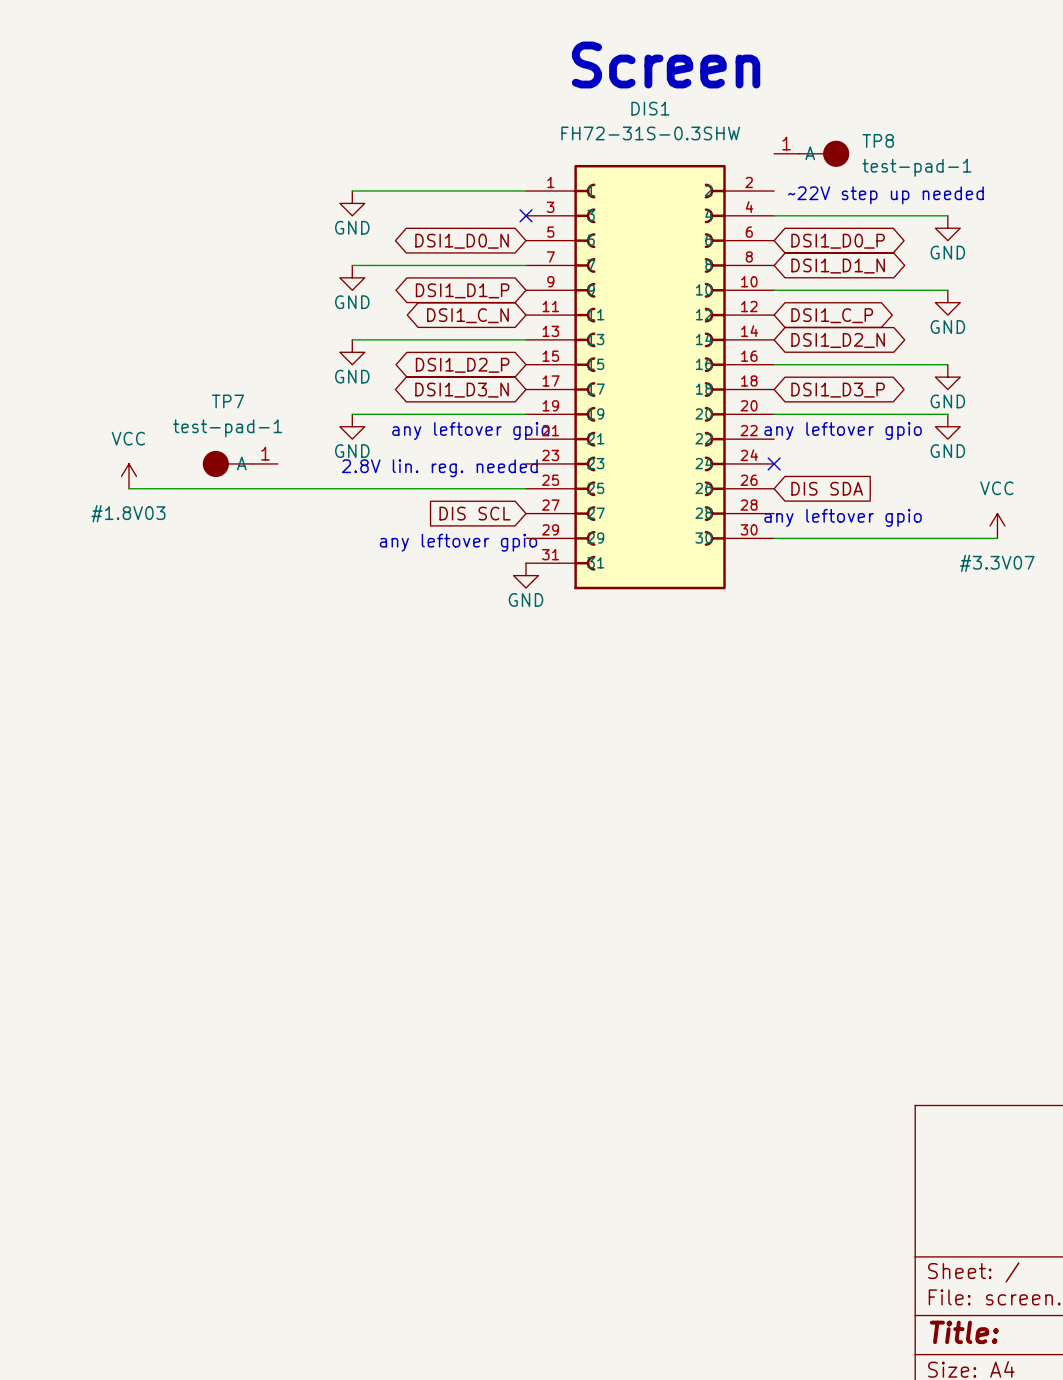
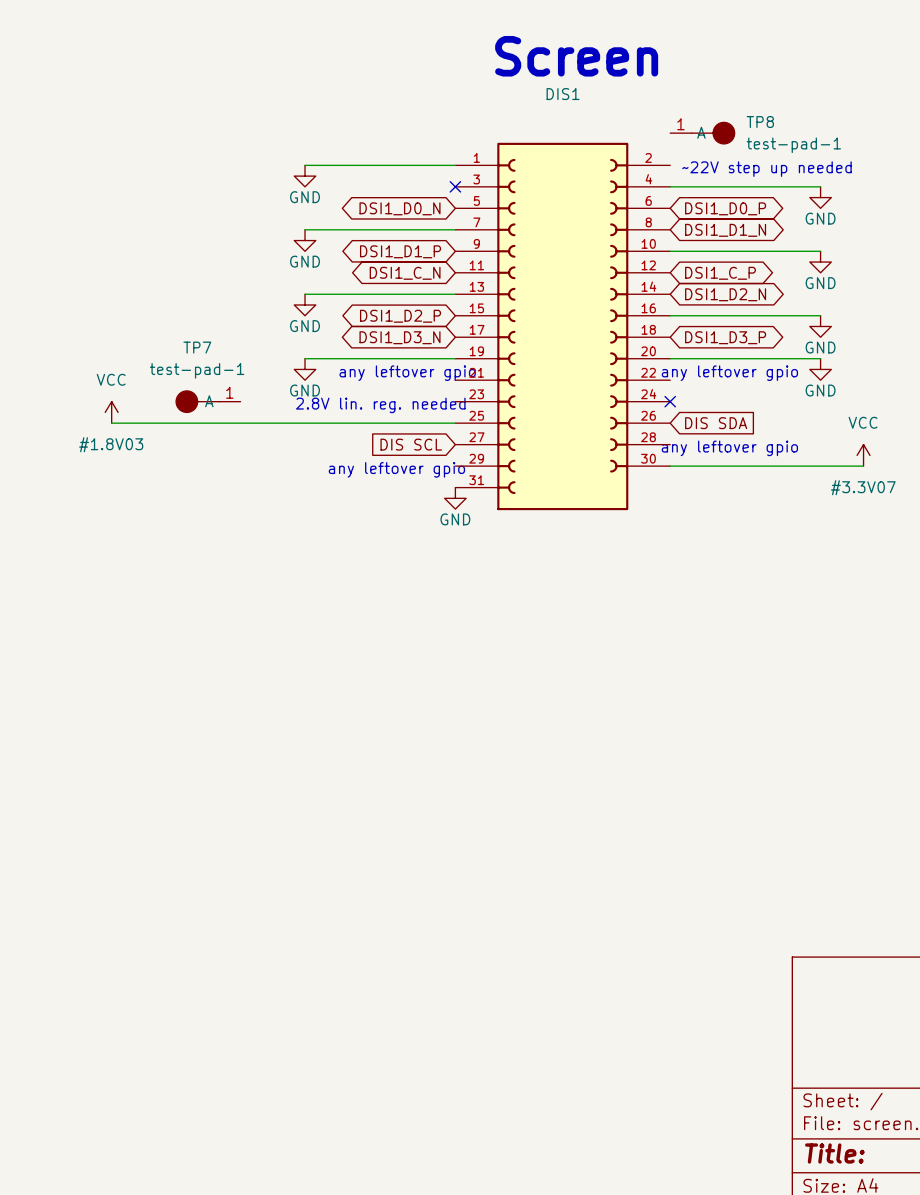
DIS1 value: FH72-31S-0.3SHW (650, 133) -> none
DIS1 symbol: [526, 164, 775, 590] -> [455, 142, 671, 511]

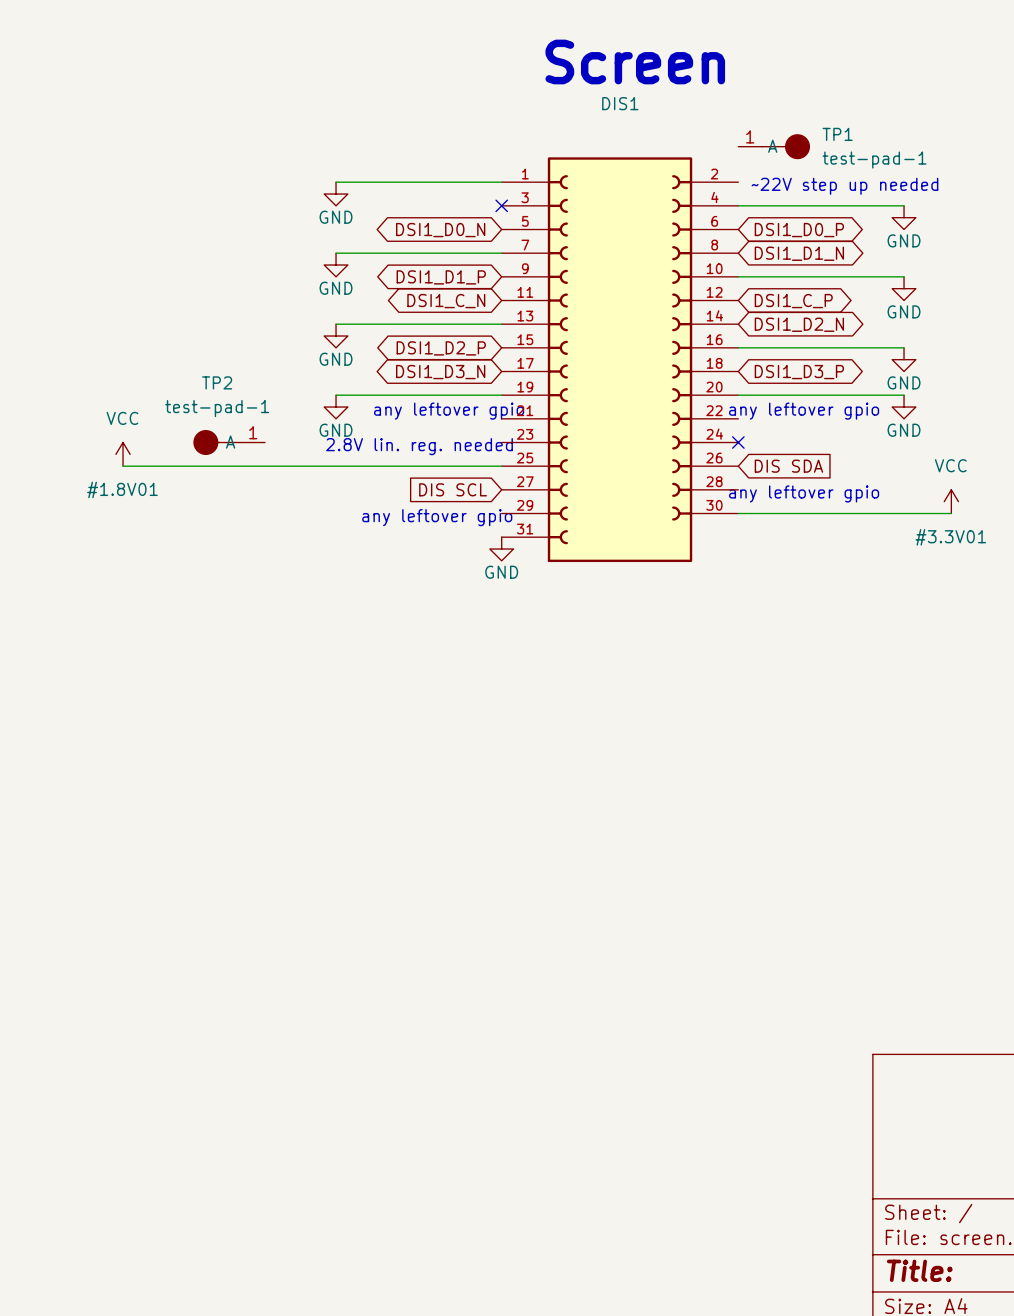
TP8 name: TP8 (760, 122) -> TP1 (837, 134)
TP7 name: TP7 (197, 347) -> TP2 (217, 382)
#1.8V03 name: #1.8V03 (111, 444) -> #1.8V01 (122, 489)
#3.3V07 name: #3.3V07 (863, 487) -> #3.3V01 (950, 537)

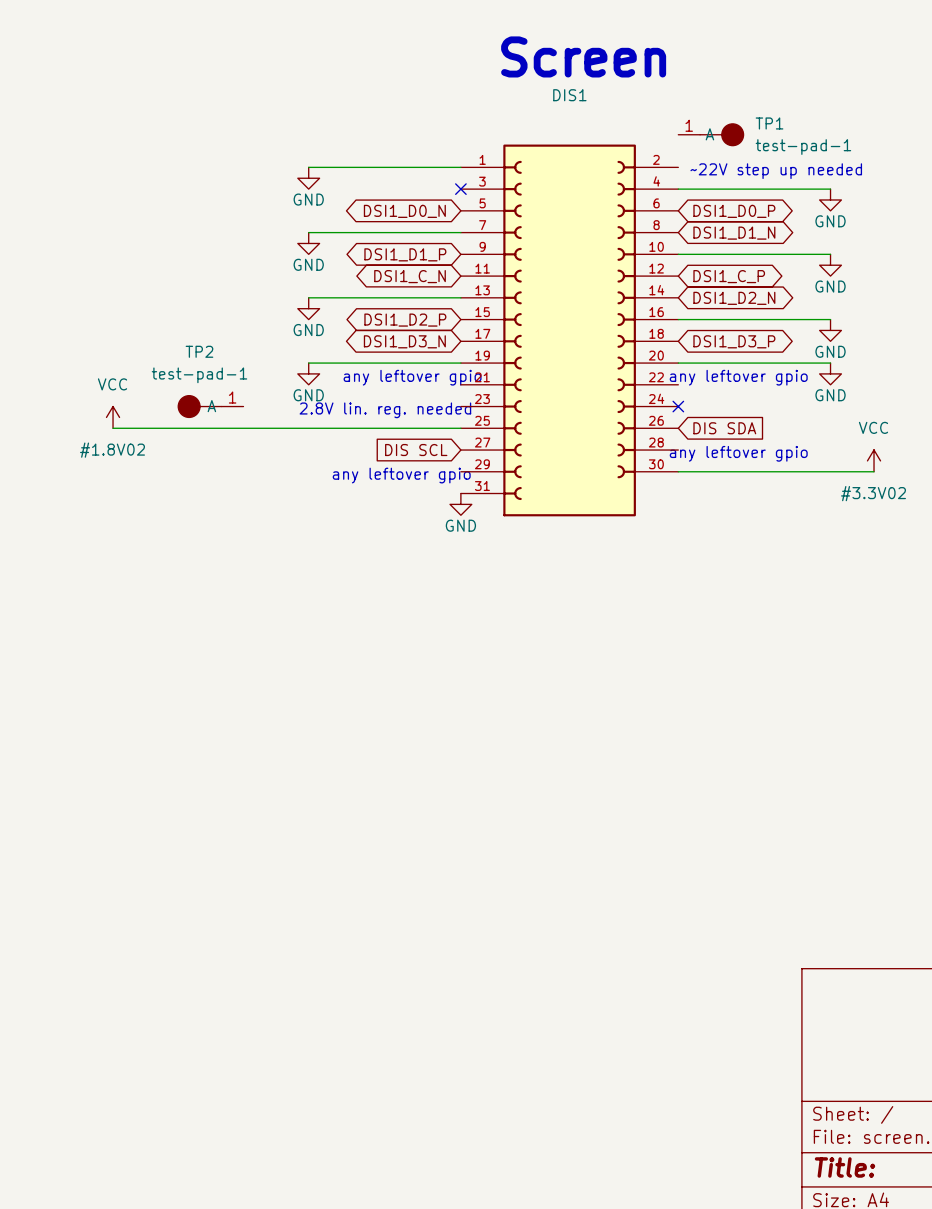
#1.8V01 name: #1.8V01 (122, 489) -> #1.8V02 (112, 450)
#3.3V01 name: #3.3V01 (950, 537) -> #3.3V02 (873, 493)

